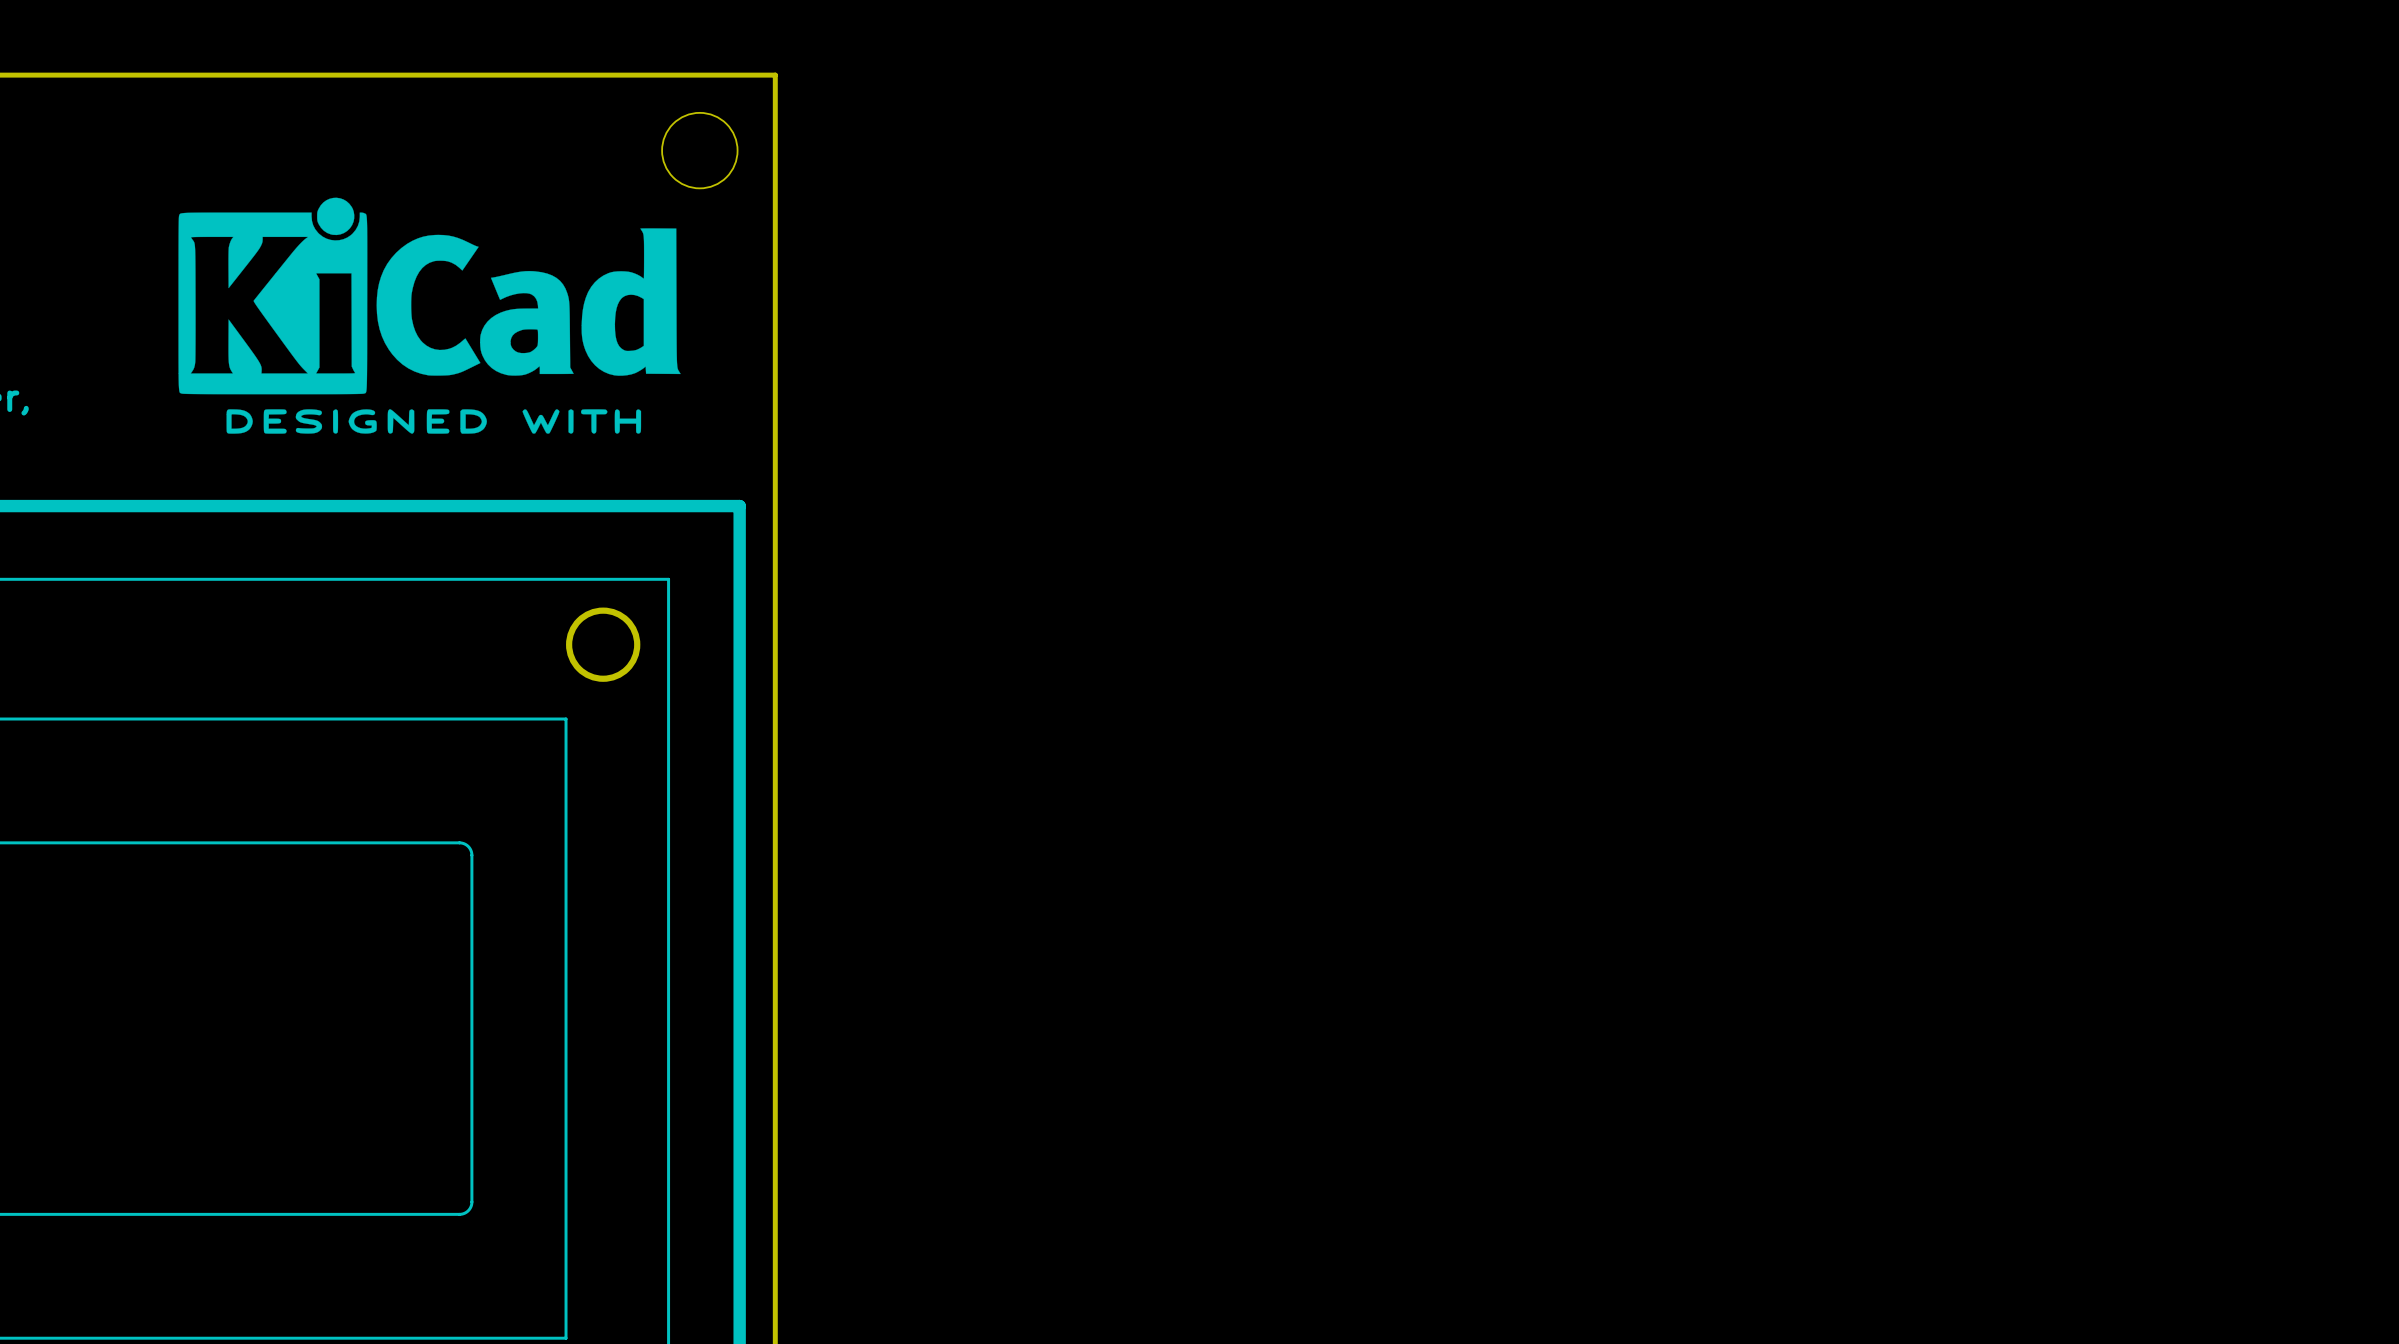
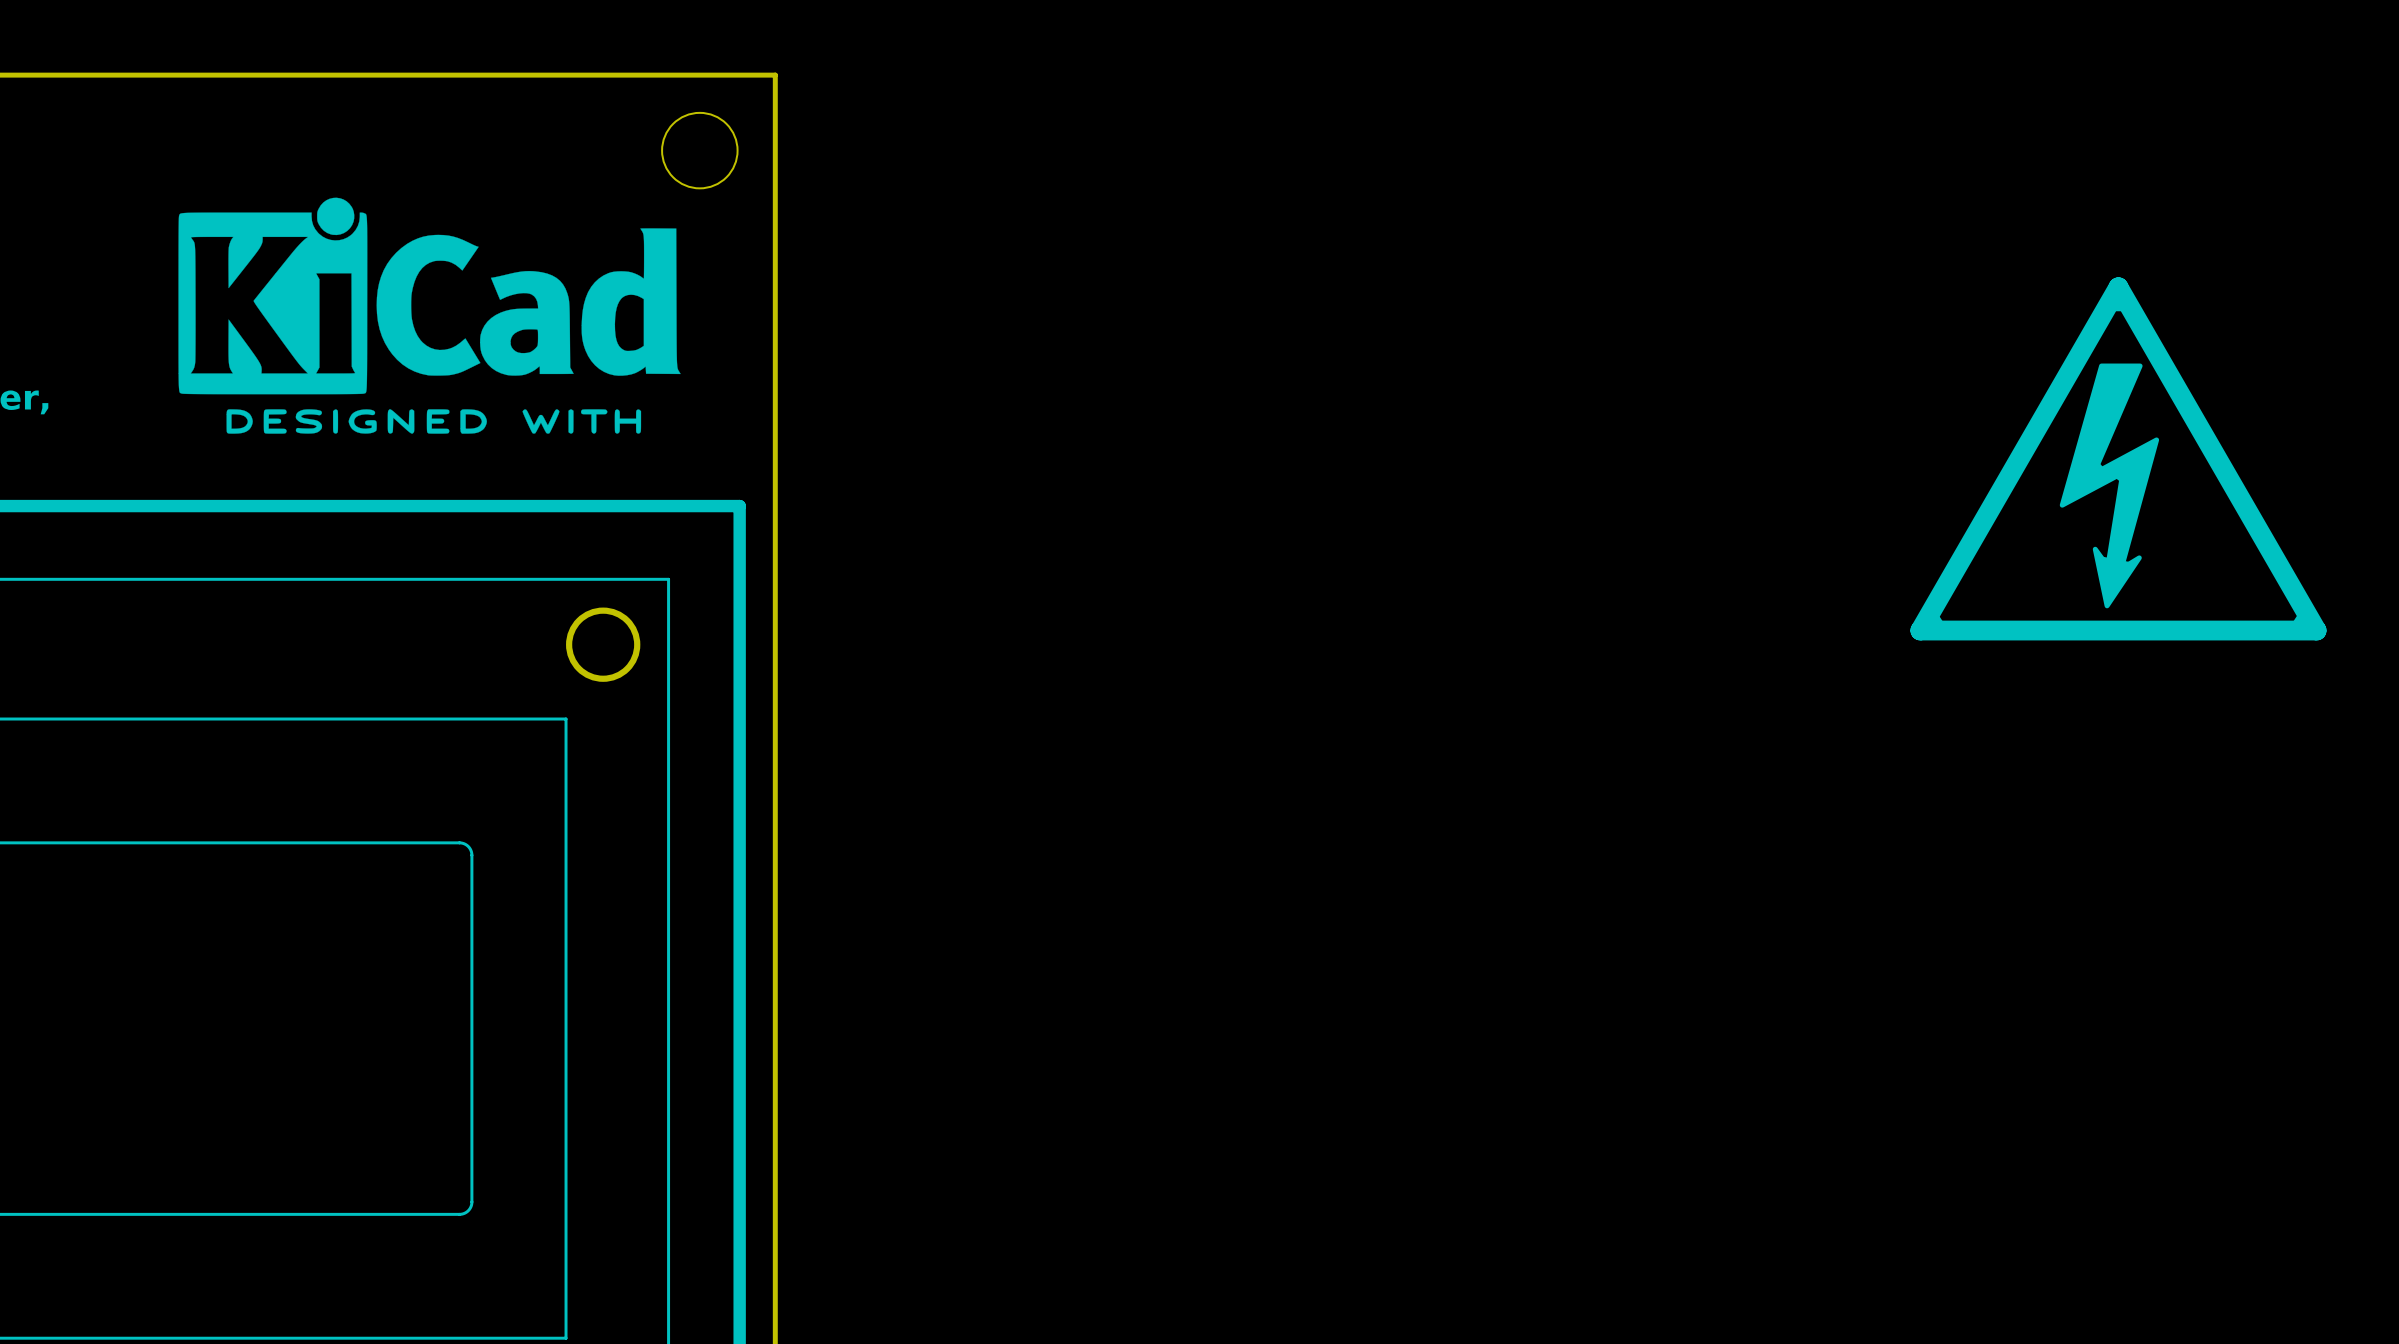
drawing: none -> [1910, 277, 2327, 641]

